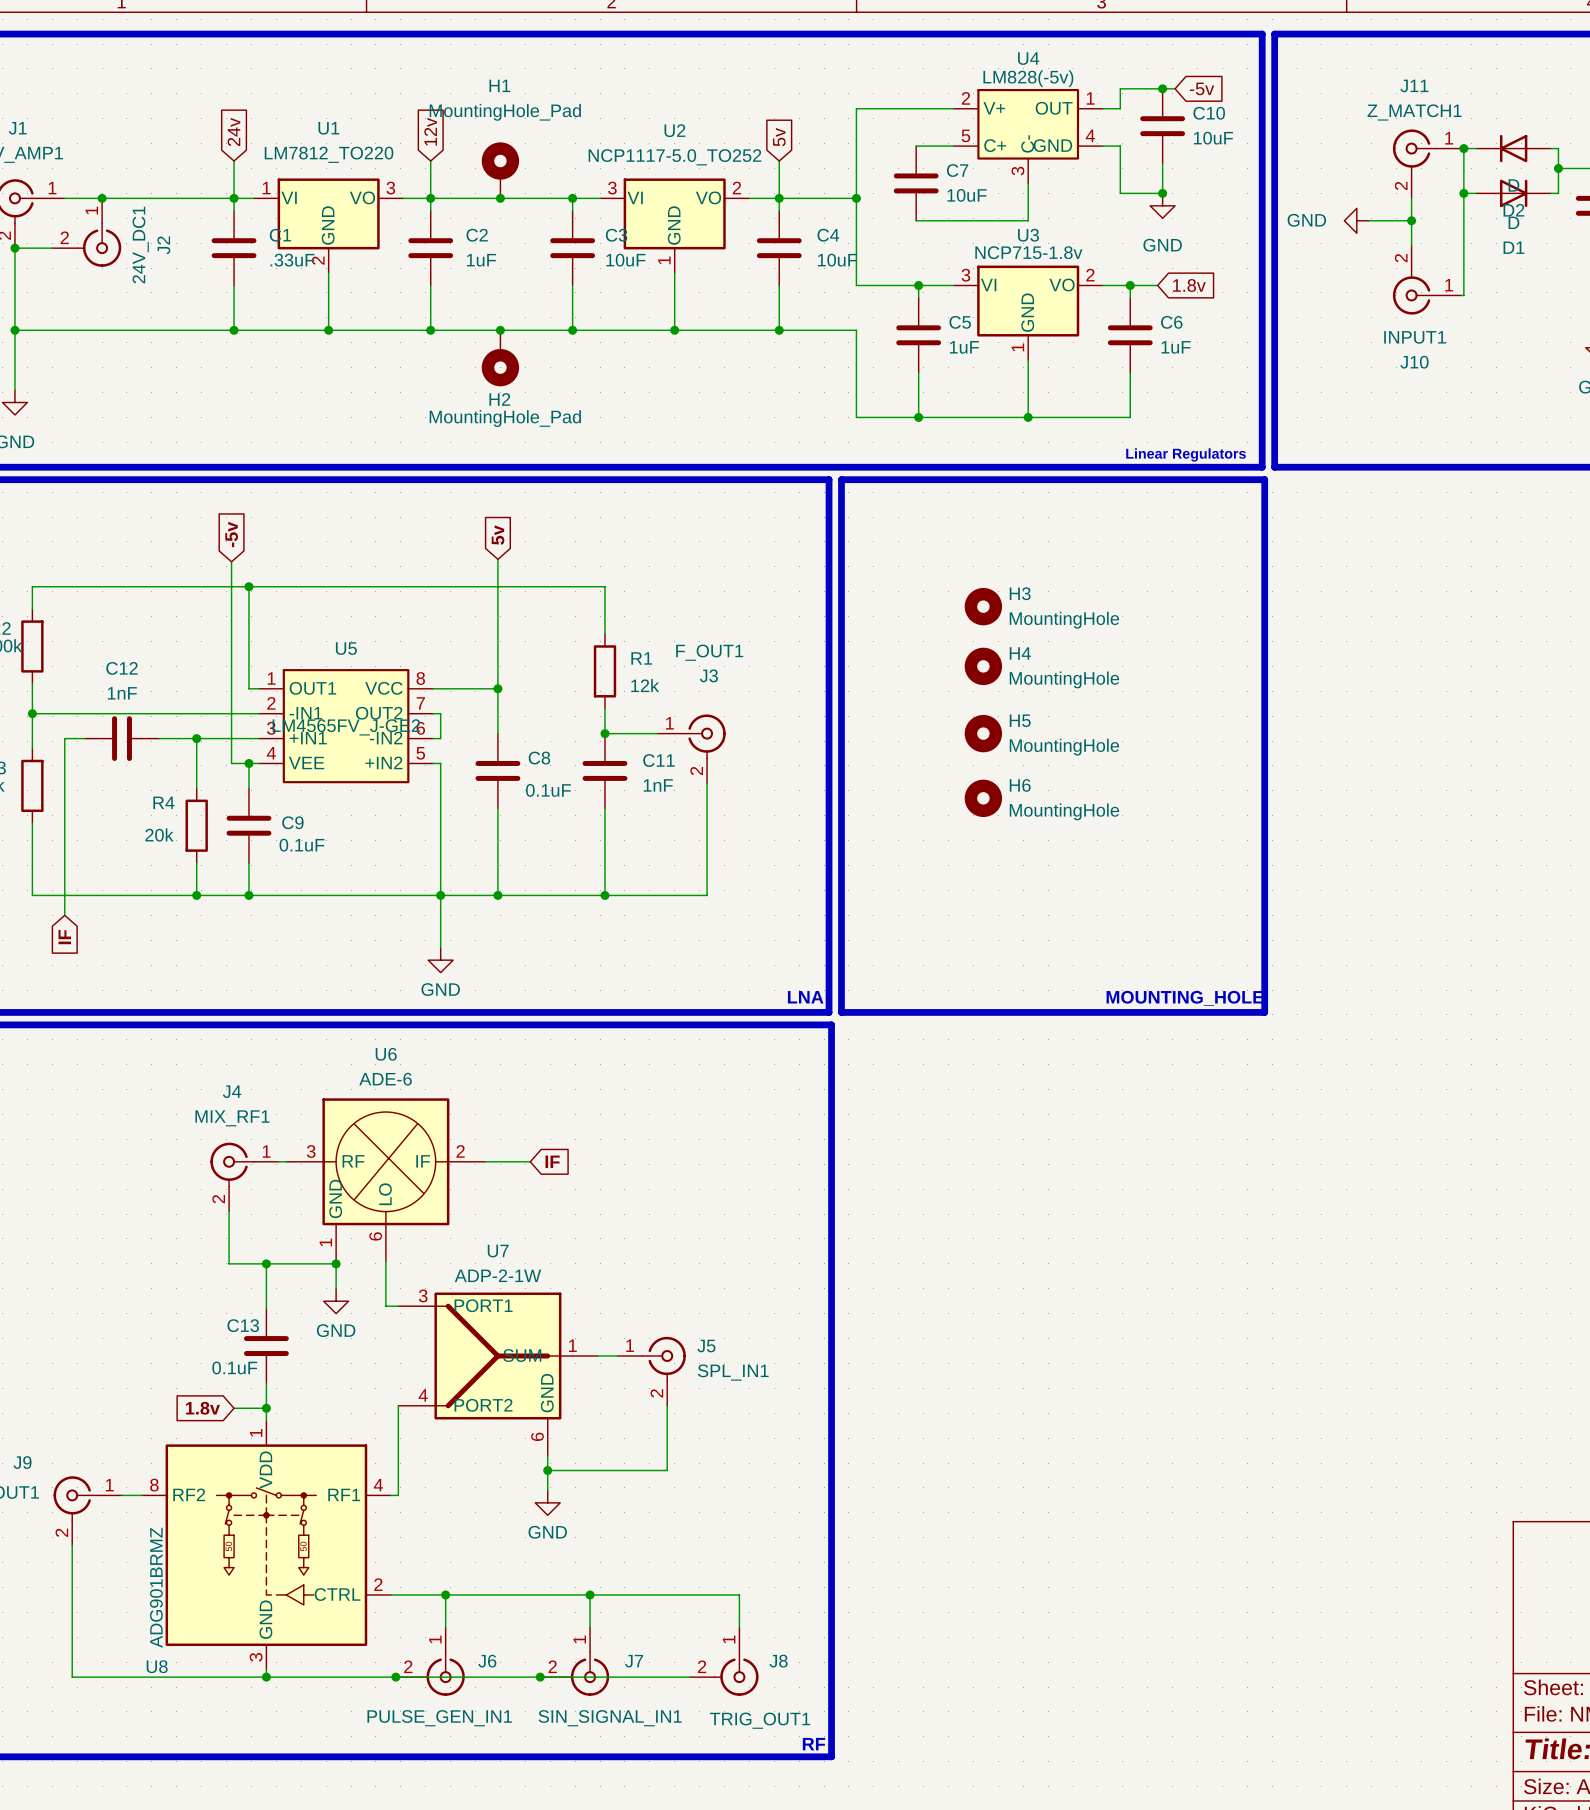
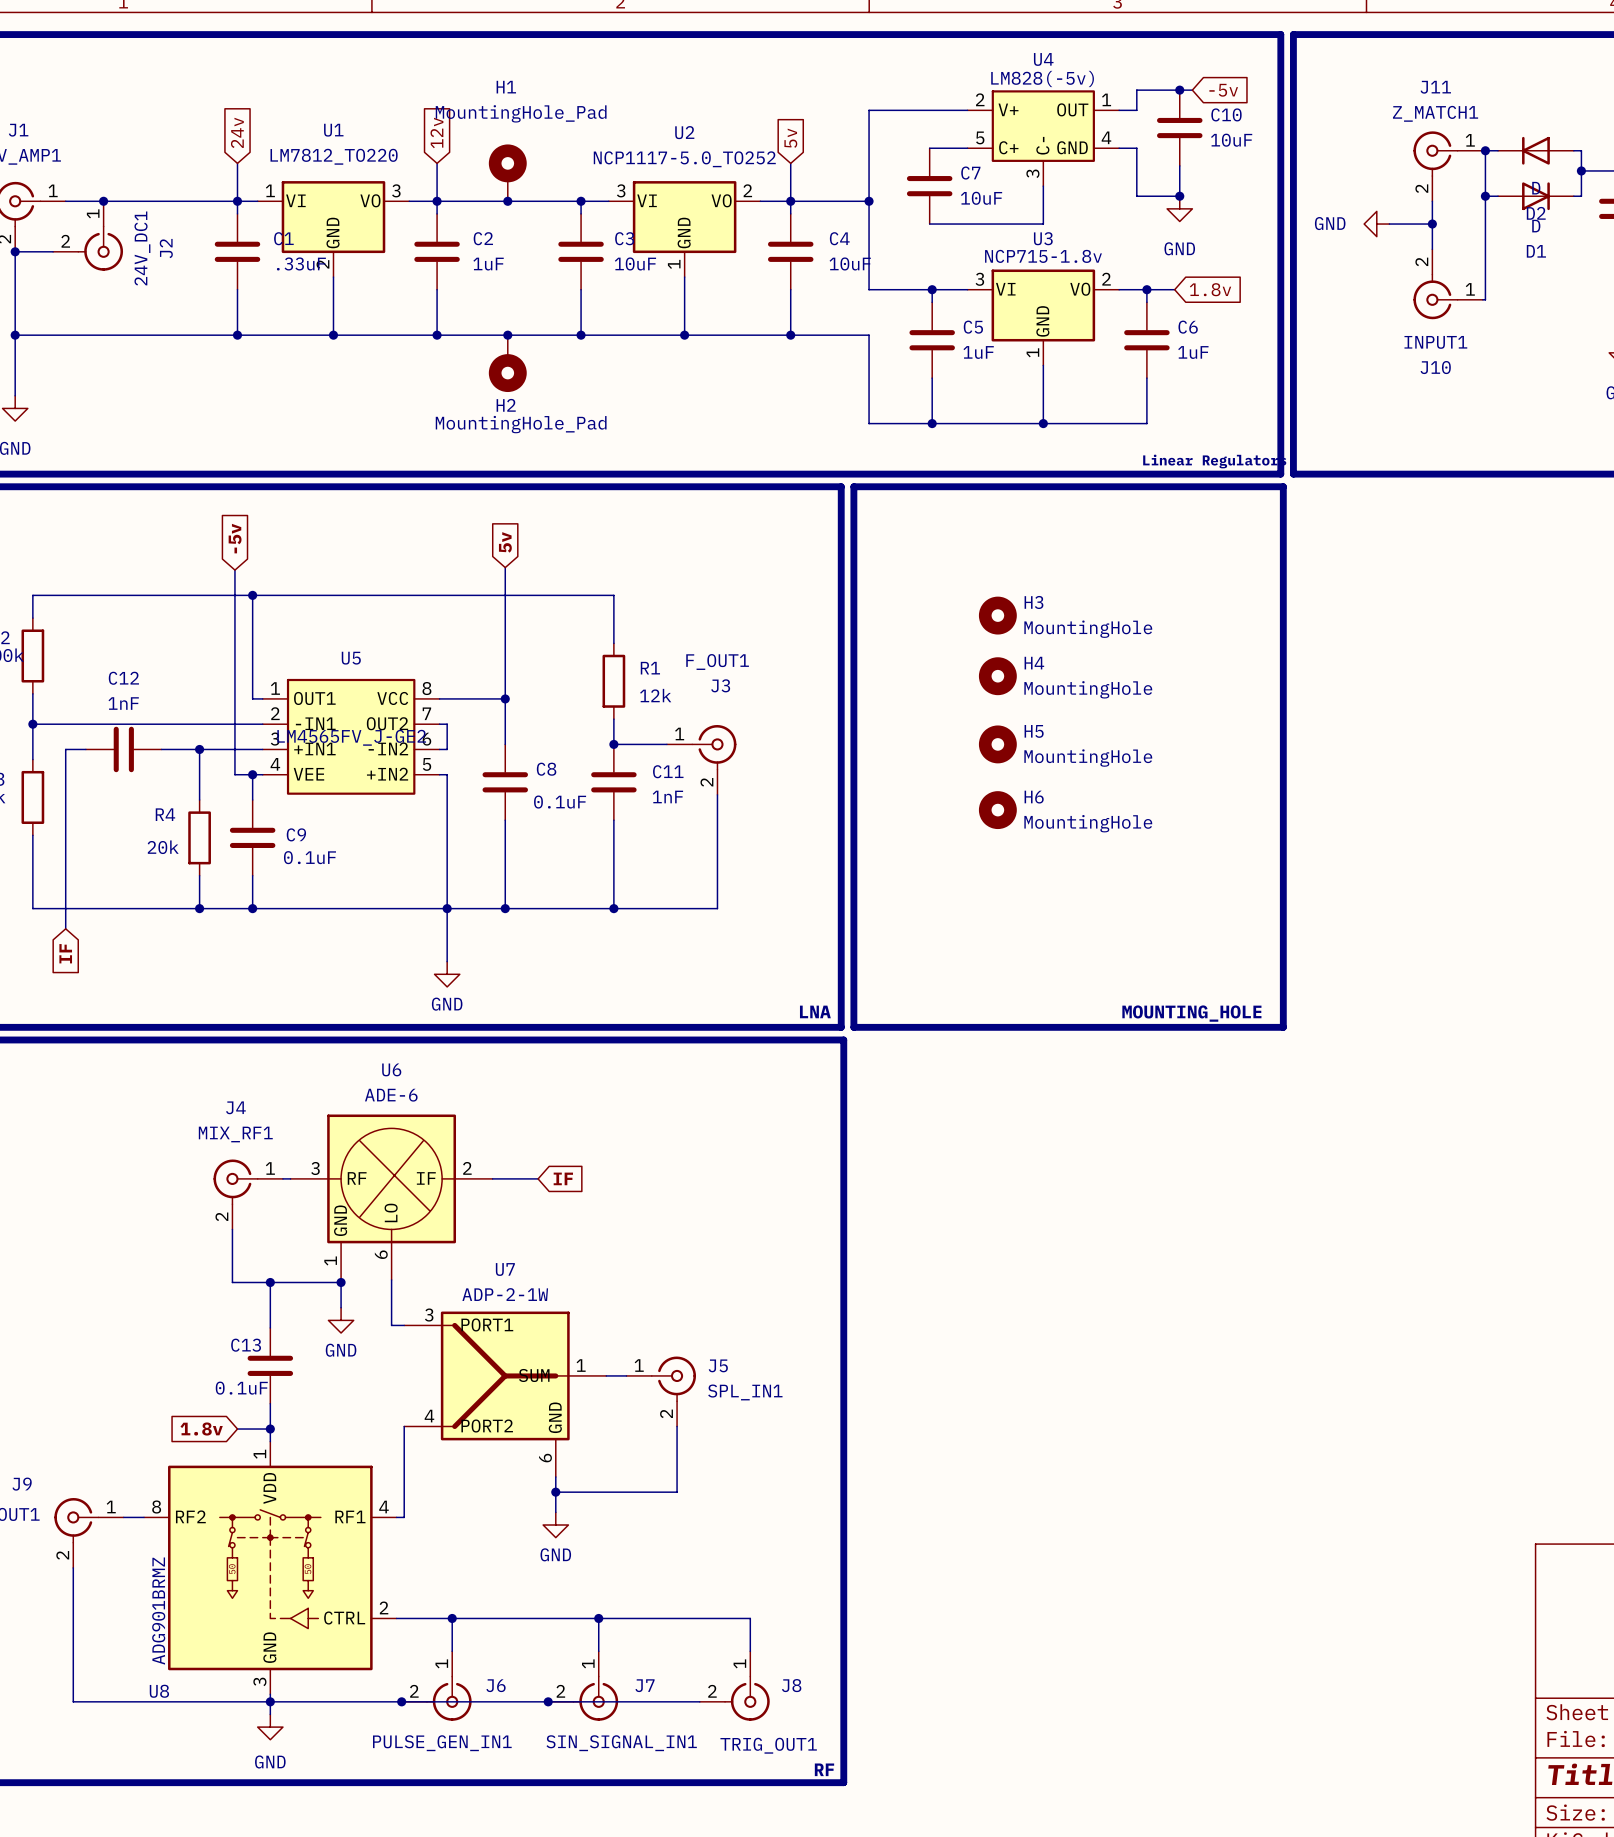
wire: none -> (270, 1701) (270, 1714)
power symbol: none -> GND (270, 1727)

